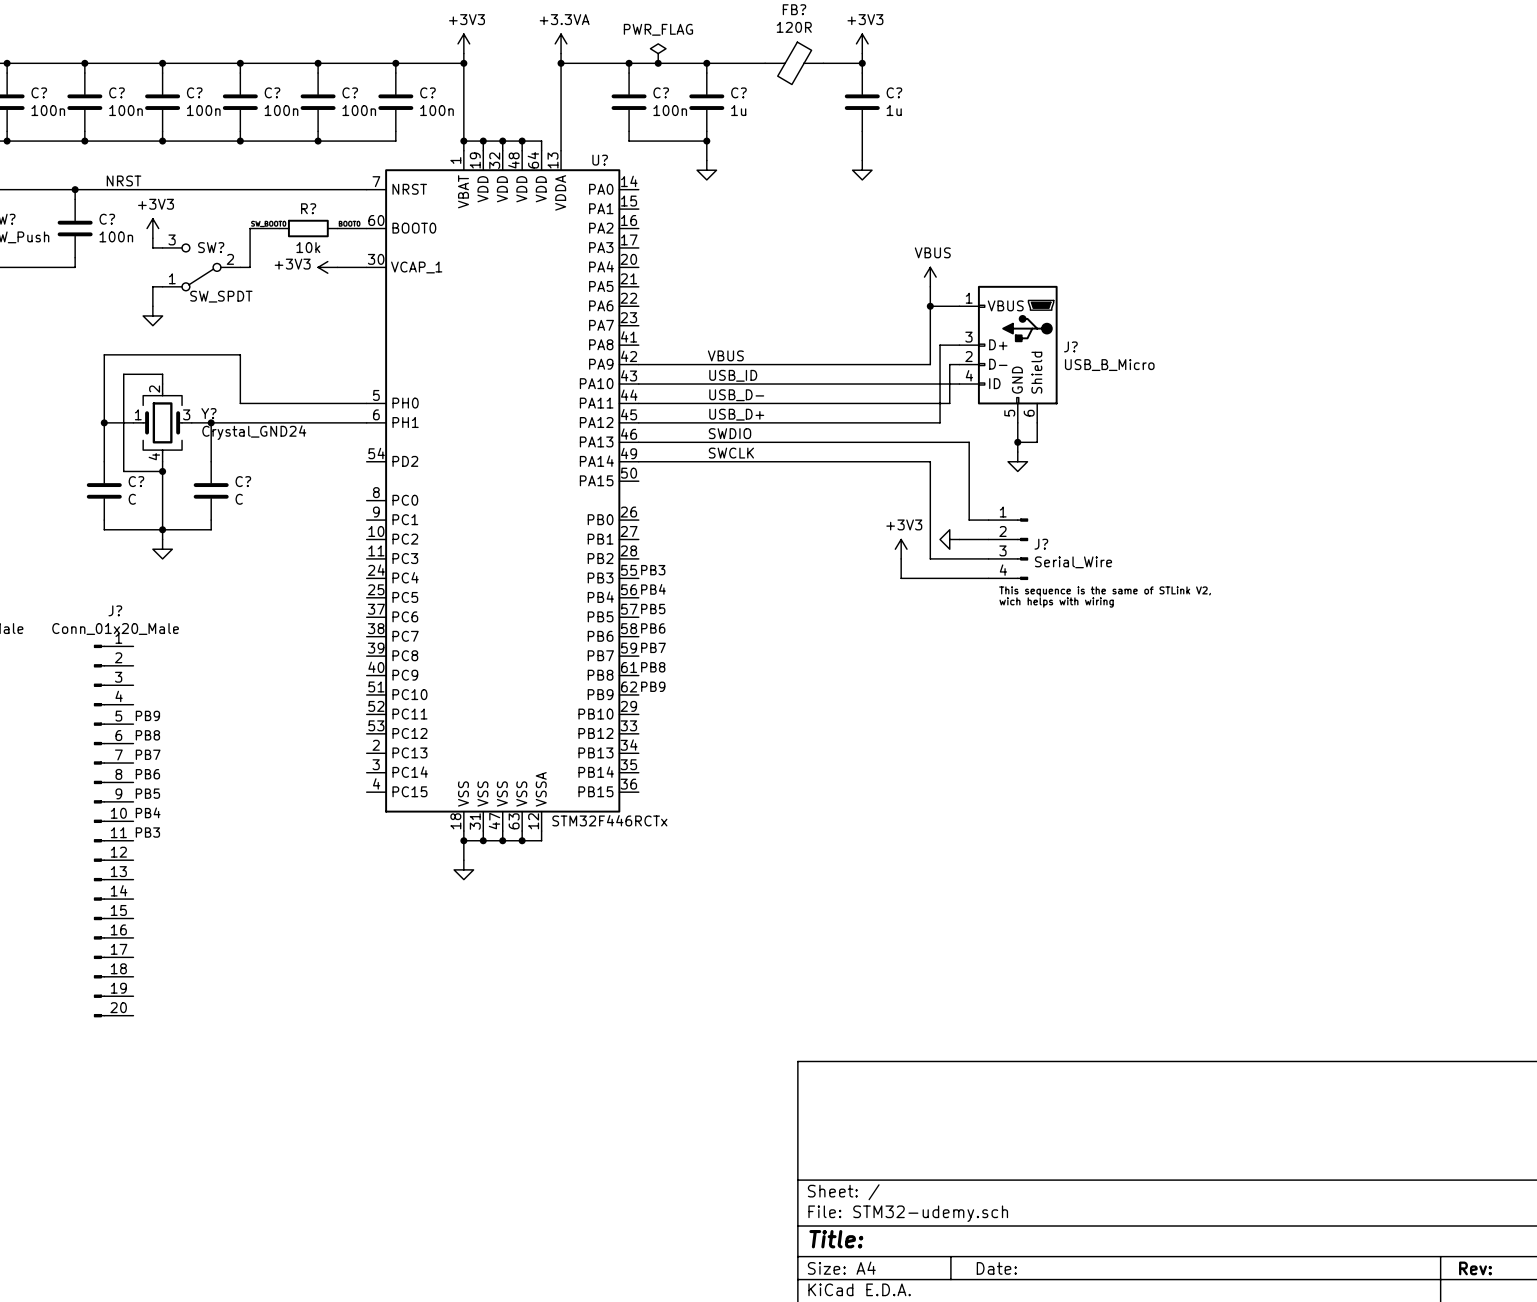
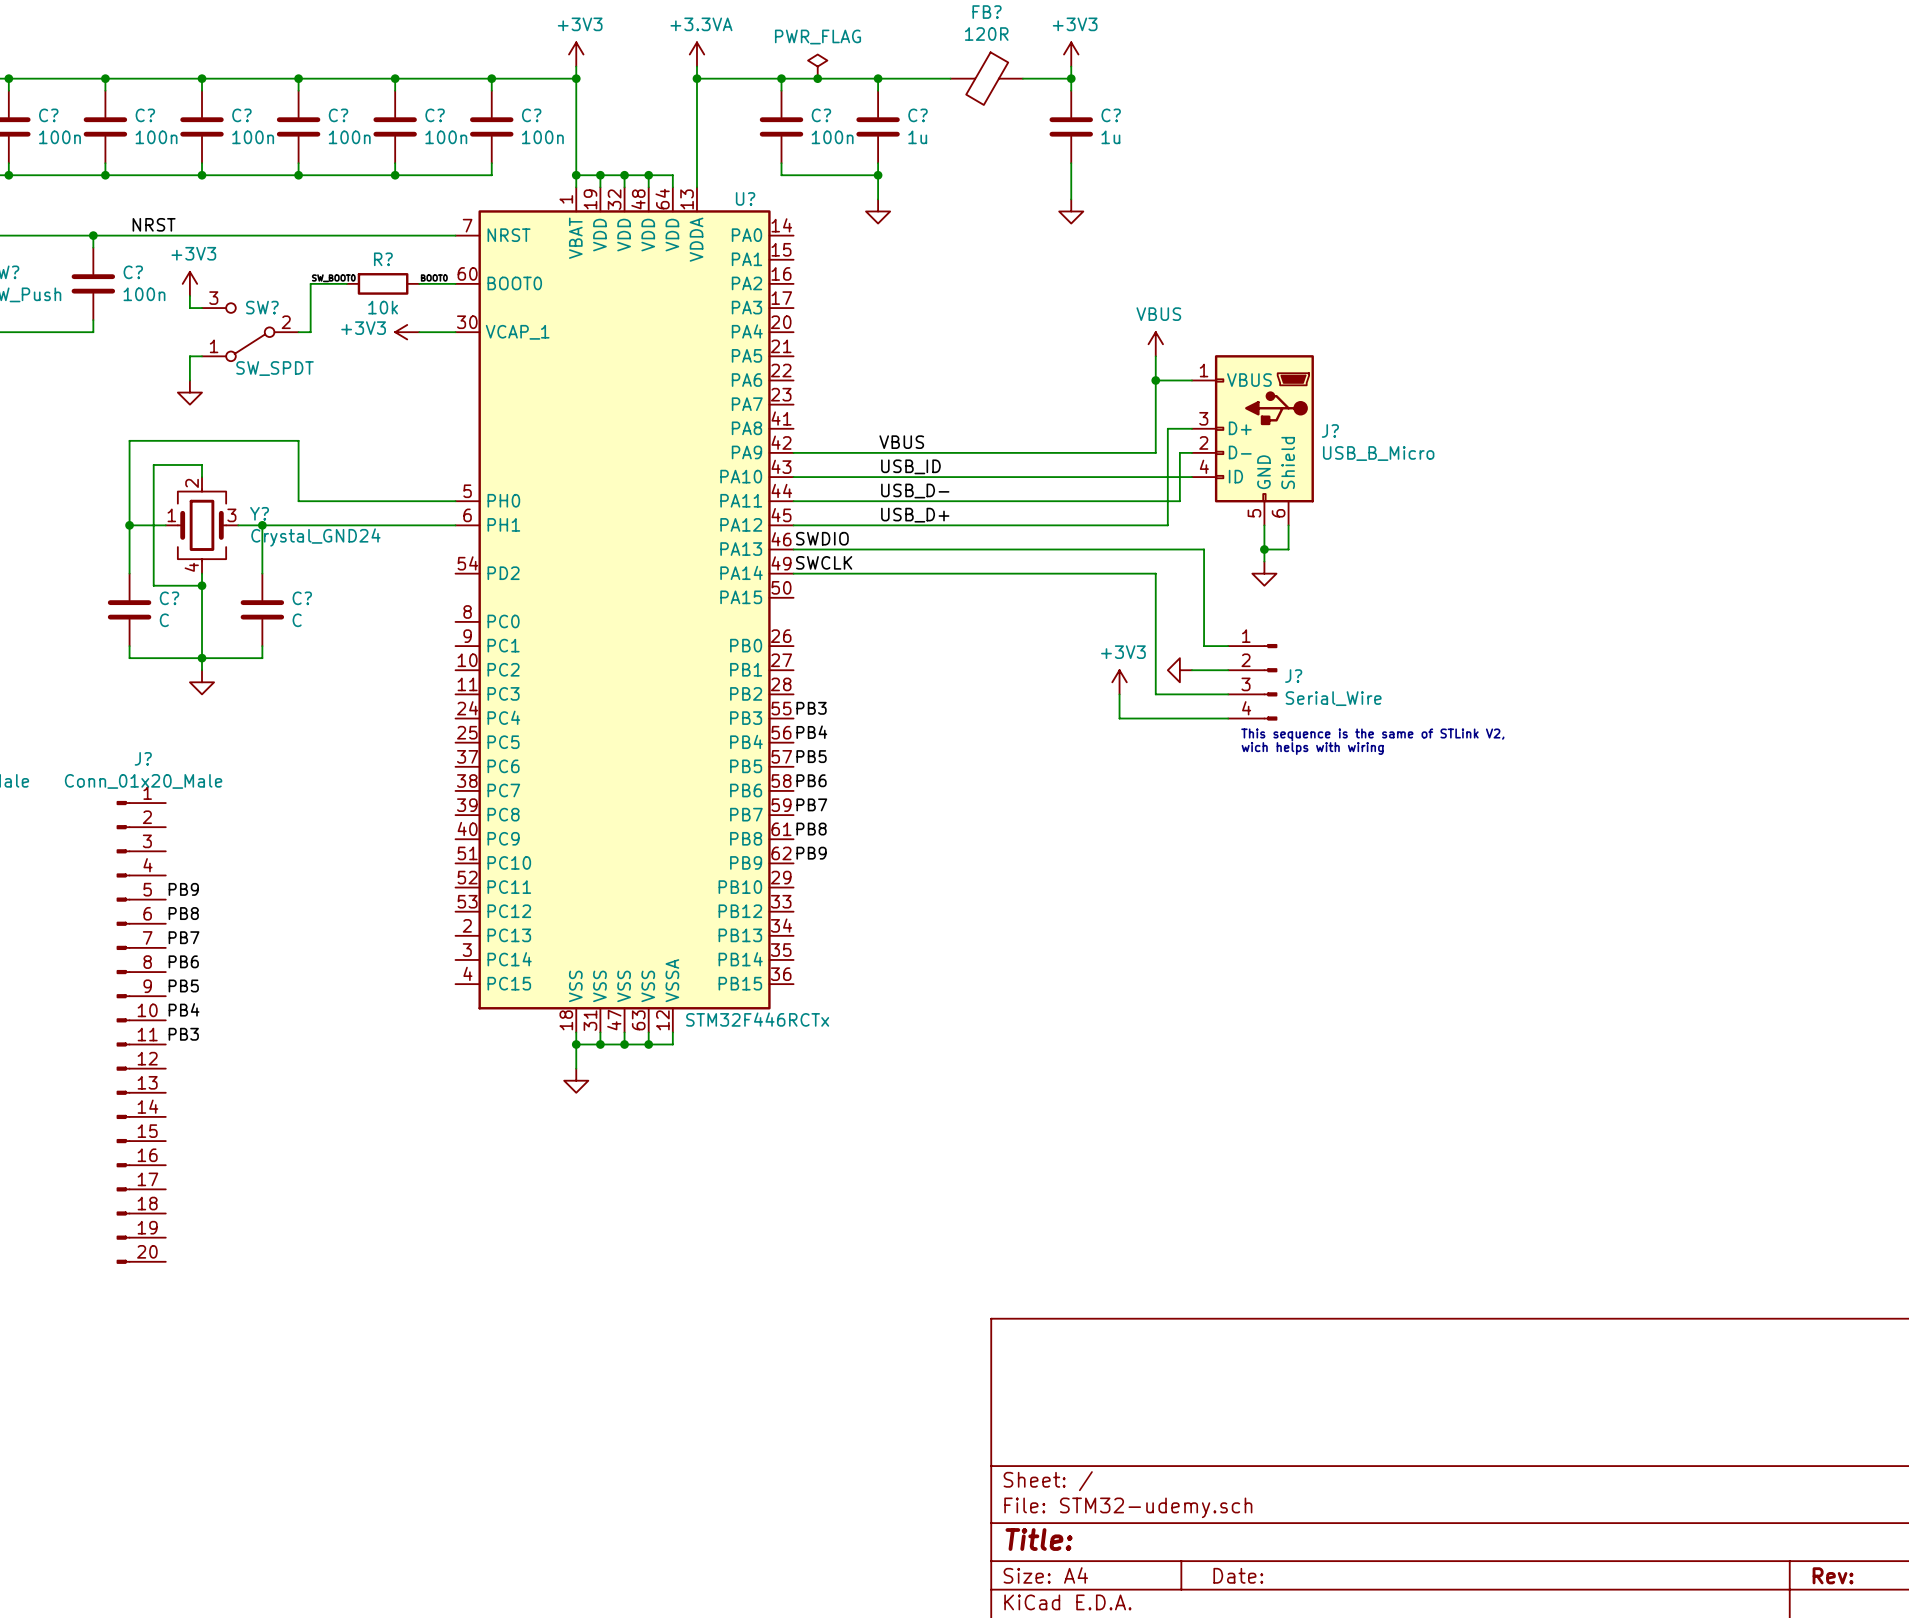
label position: SWDIO (730, 433) -> SWDIO (822, 538)
label position: SWCLK (731, 453) -> SWCLK (824, 562)

